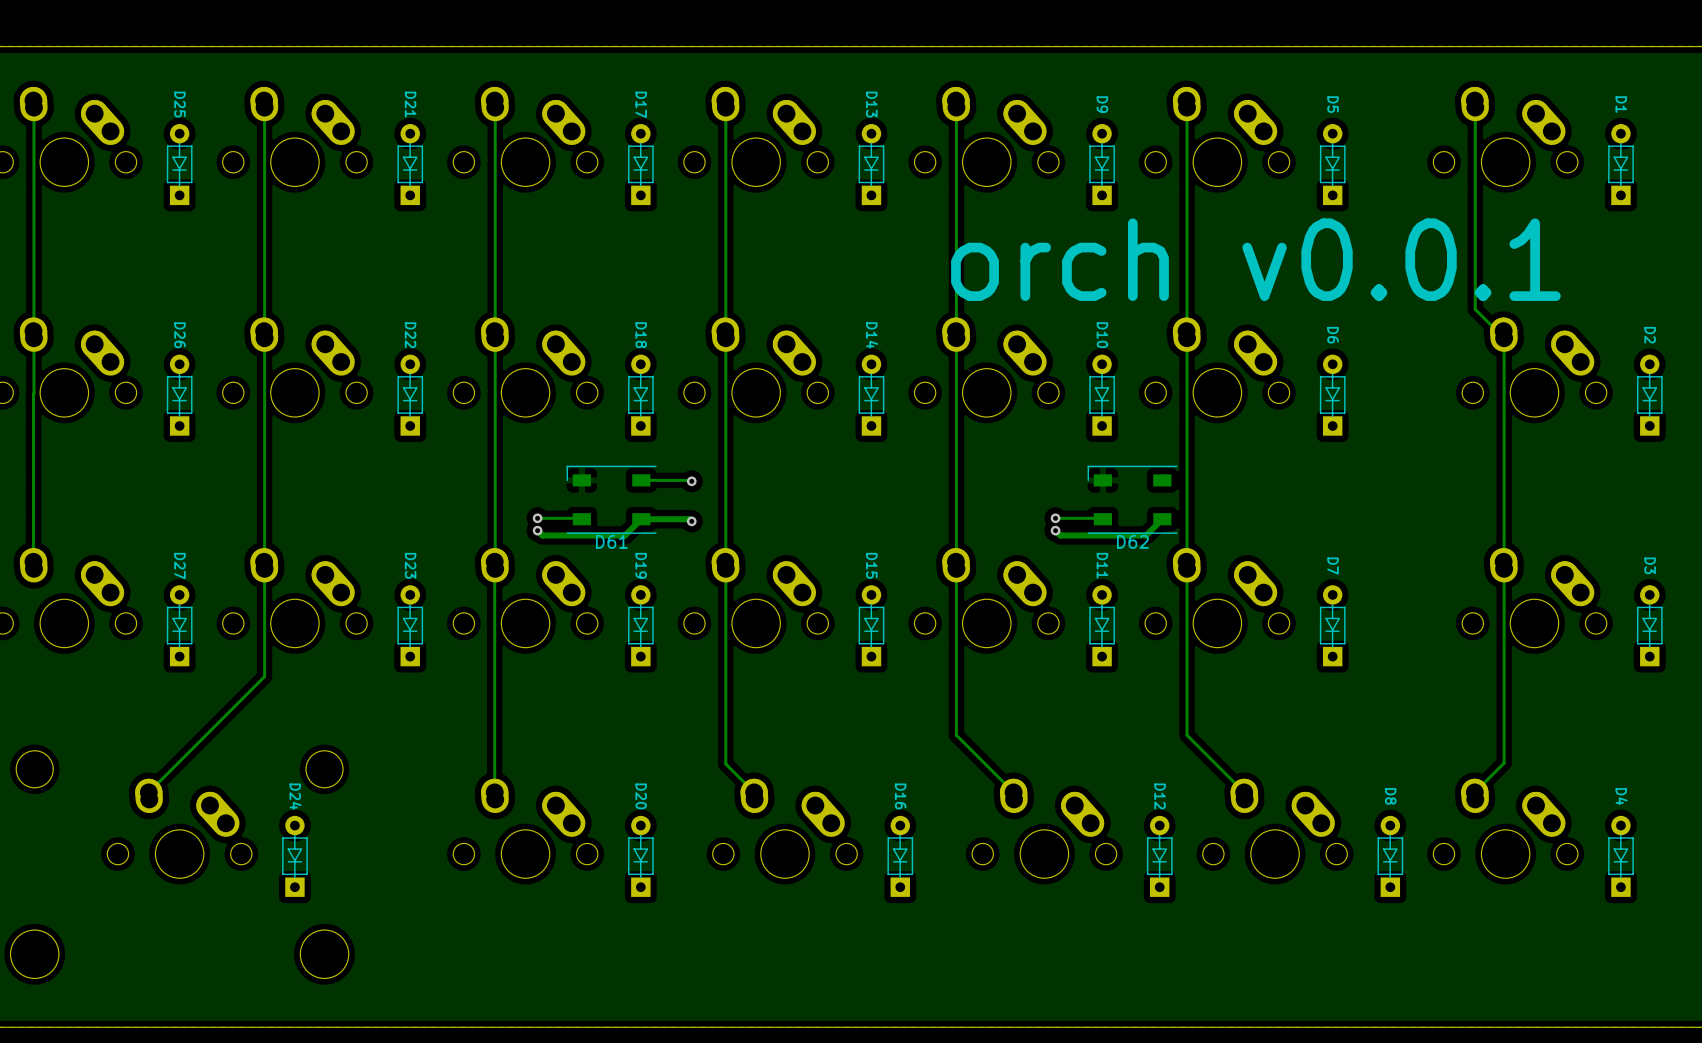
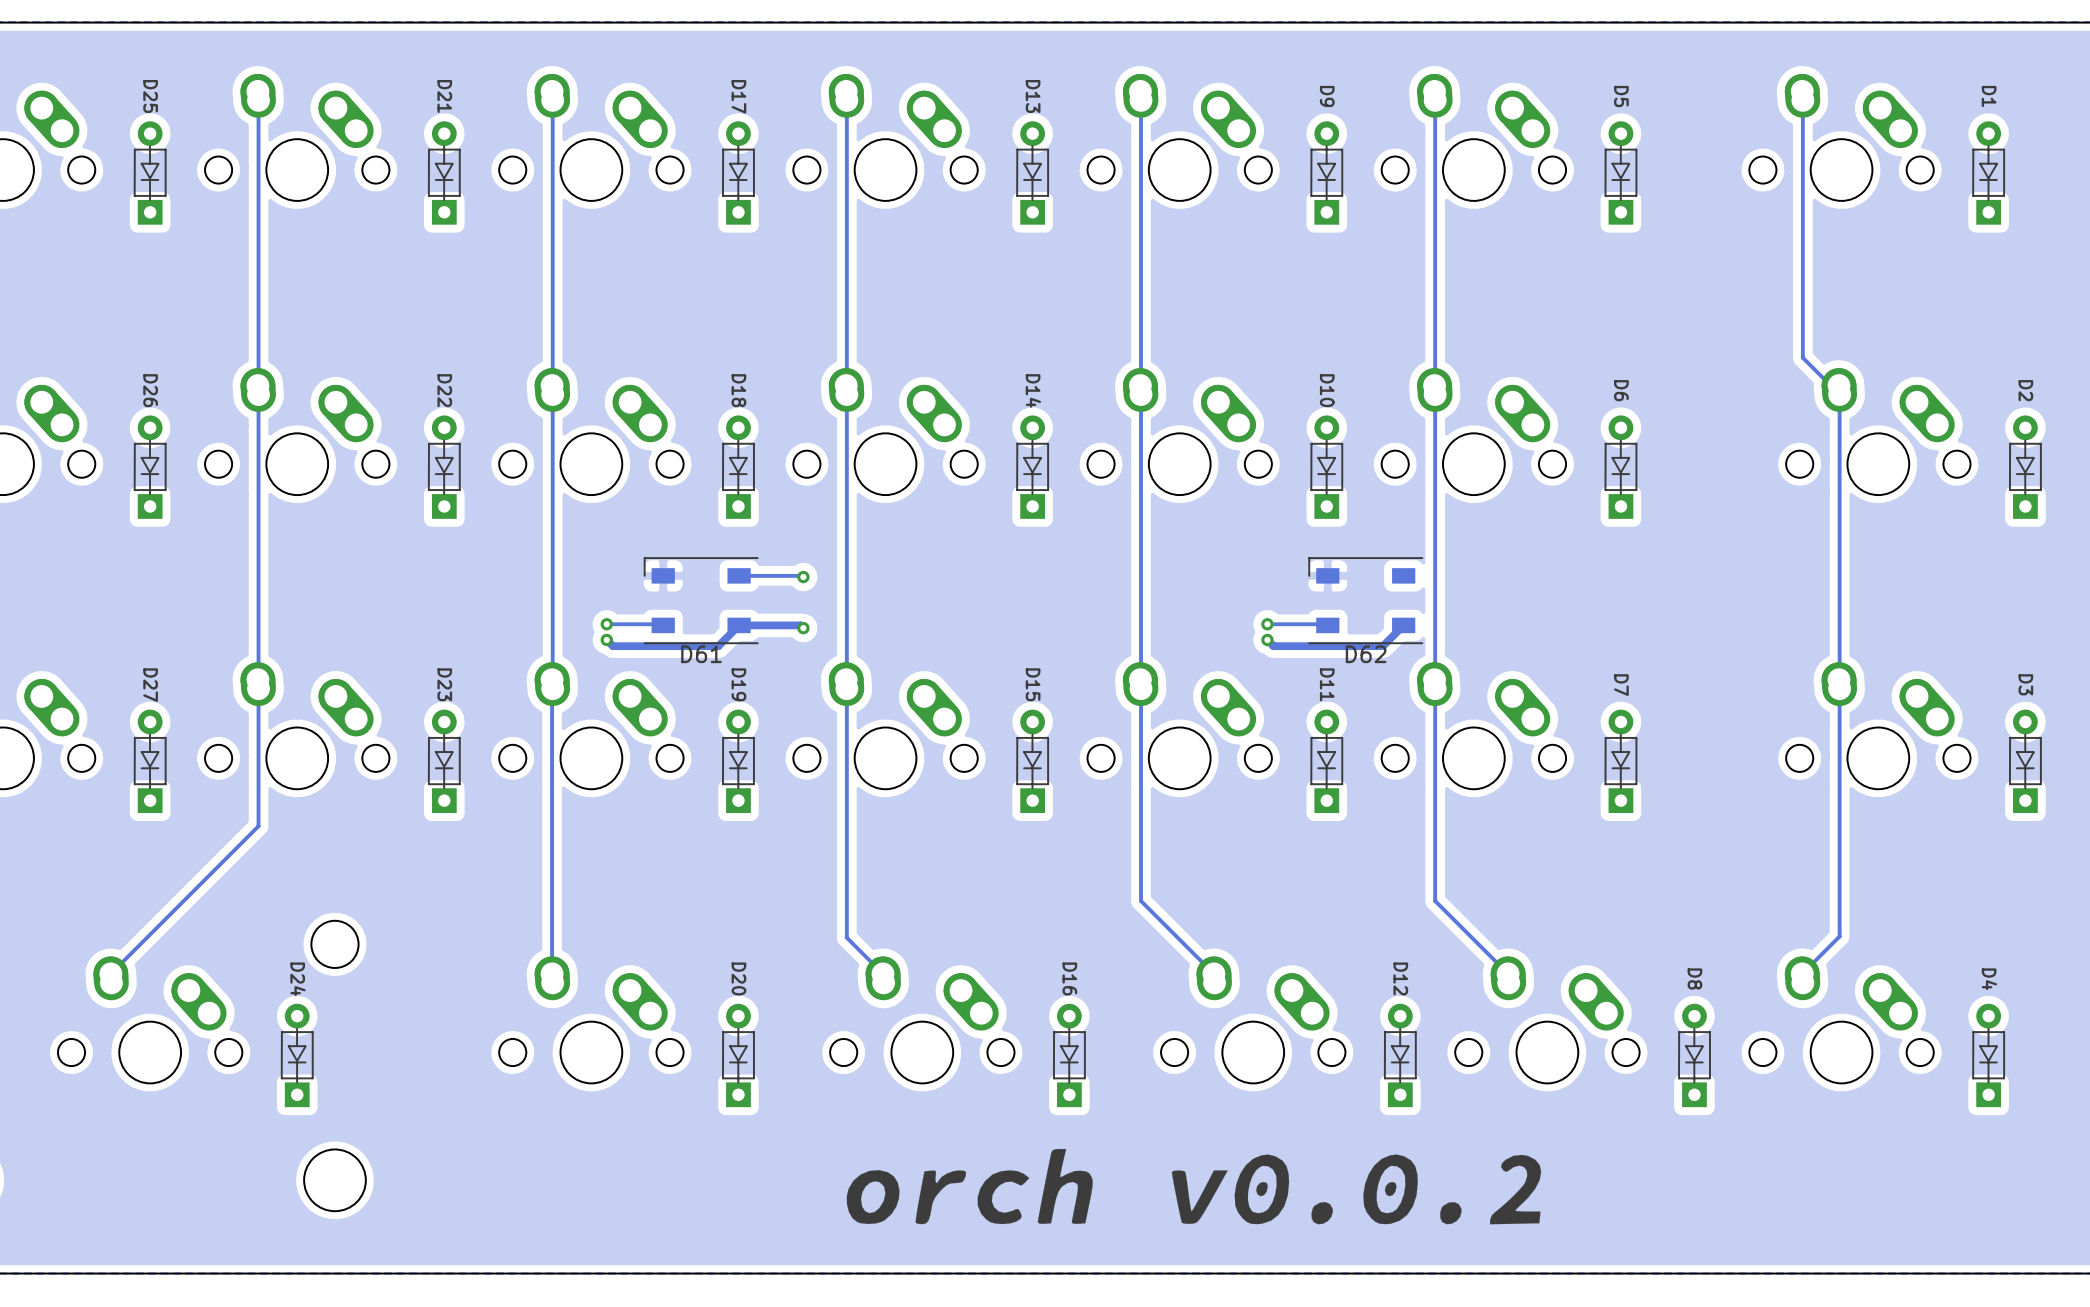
text: orch v0.0.1 (1255, 259) -> none
drawing: none -> [846, 1148, 1542, 1225]

